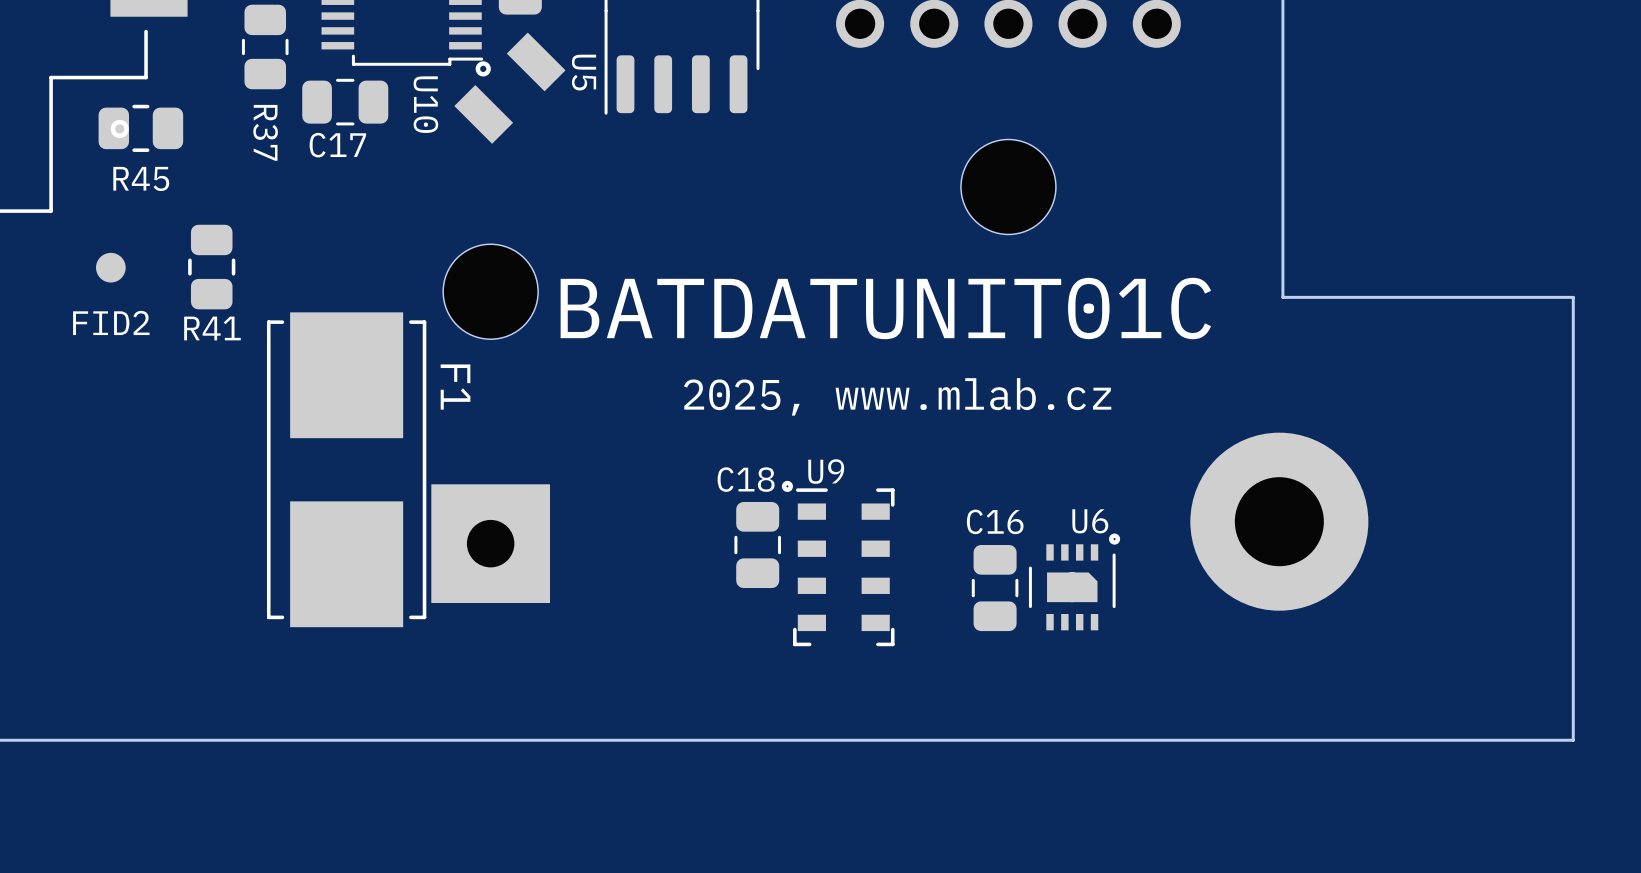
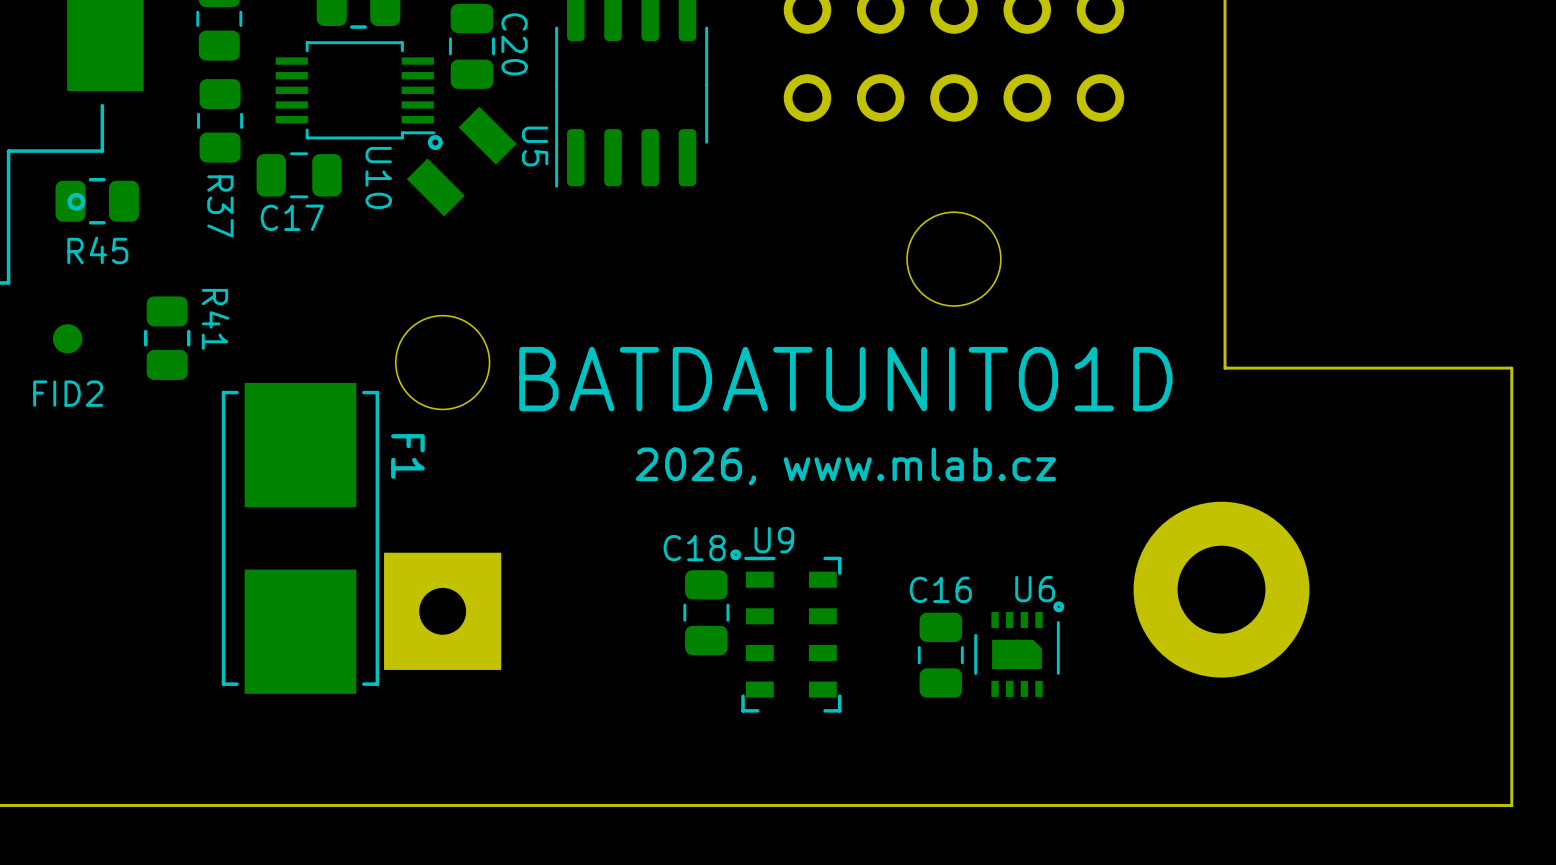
text: BATDATUNIT01C (885, 308) -> BATDATUNIT01D (845, 379)
R41 name rotation: 0° (212, 328) -> 90° clockwise (215, 319)
R41 name position: R41 (212, 328) -> R41 (215, 319)
text: 2025, www.mlab.cz (897, 396) -> 2026, www.mlab.cz (845, 466)

